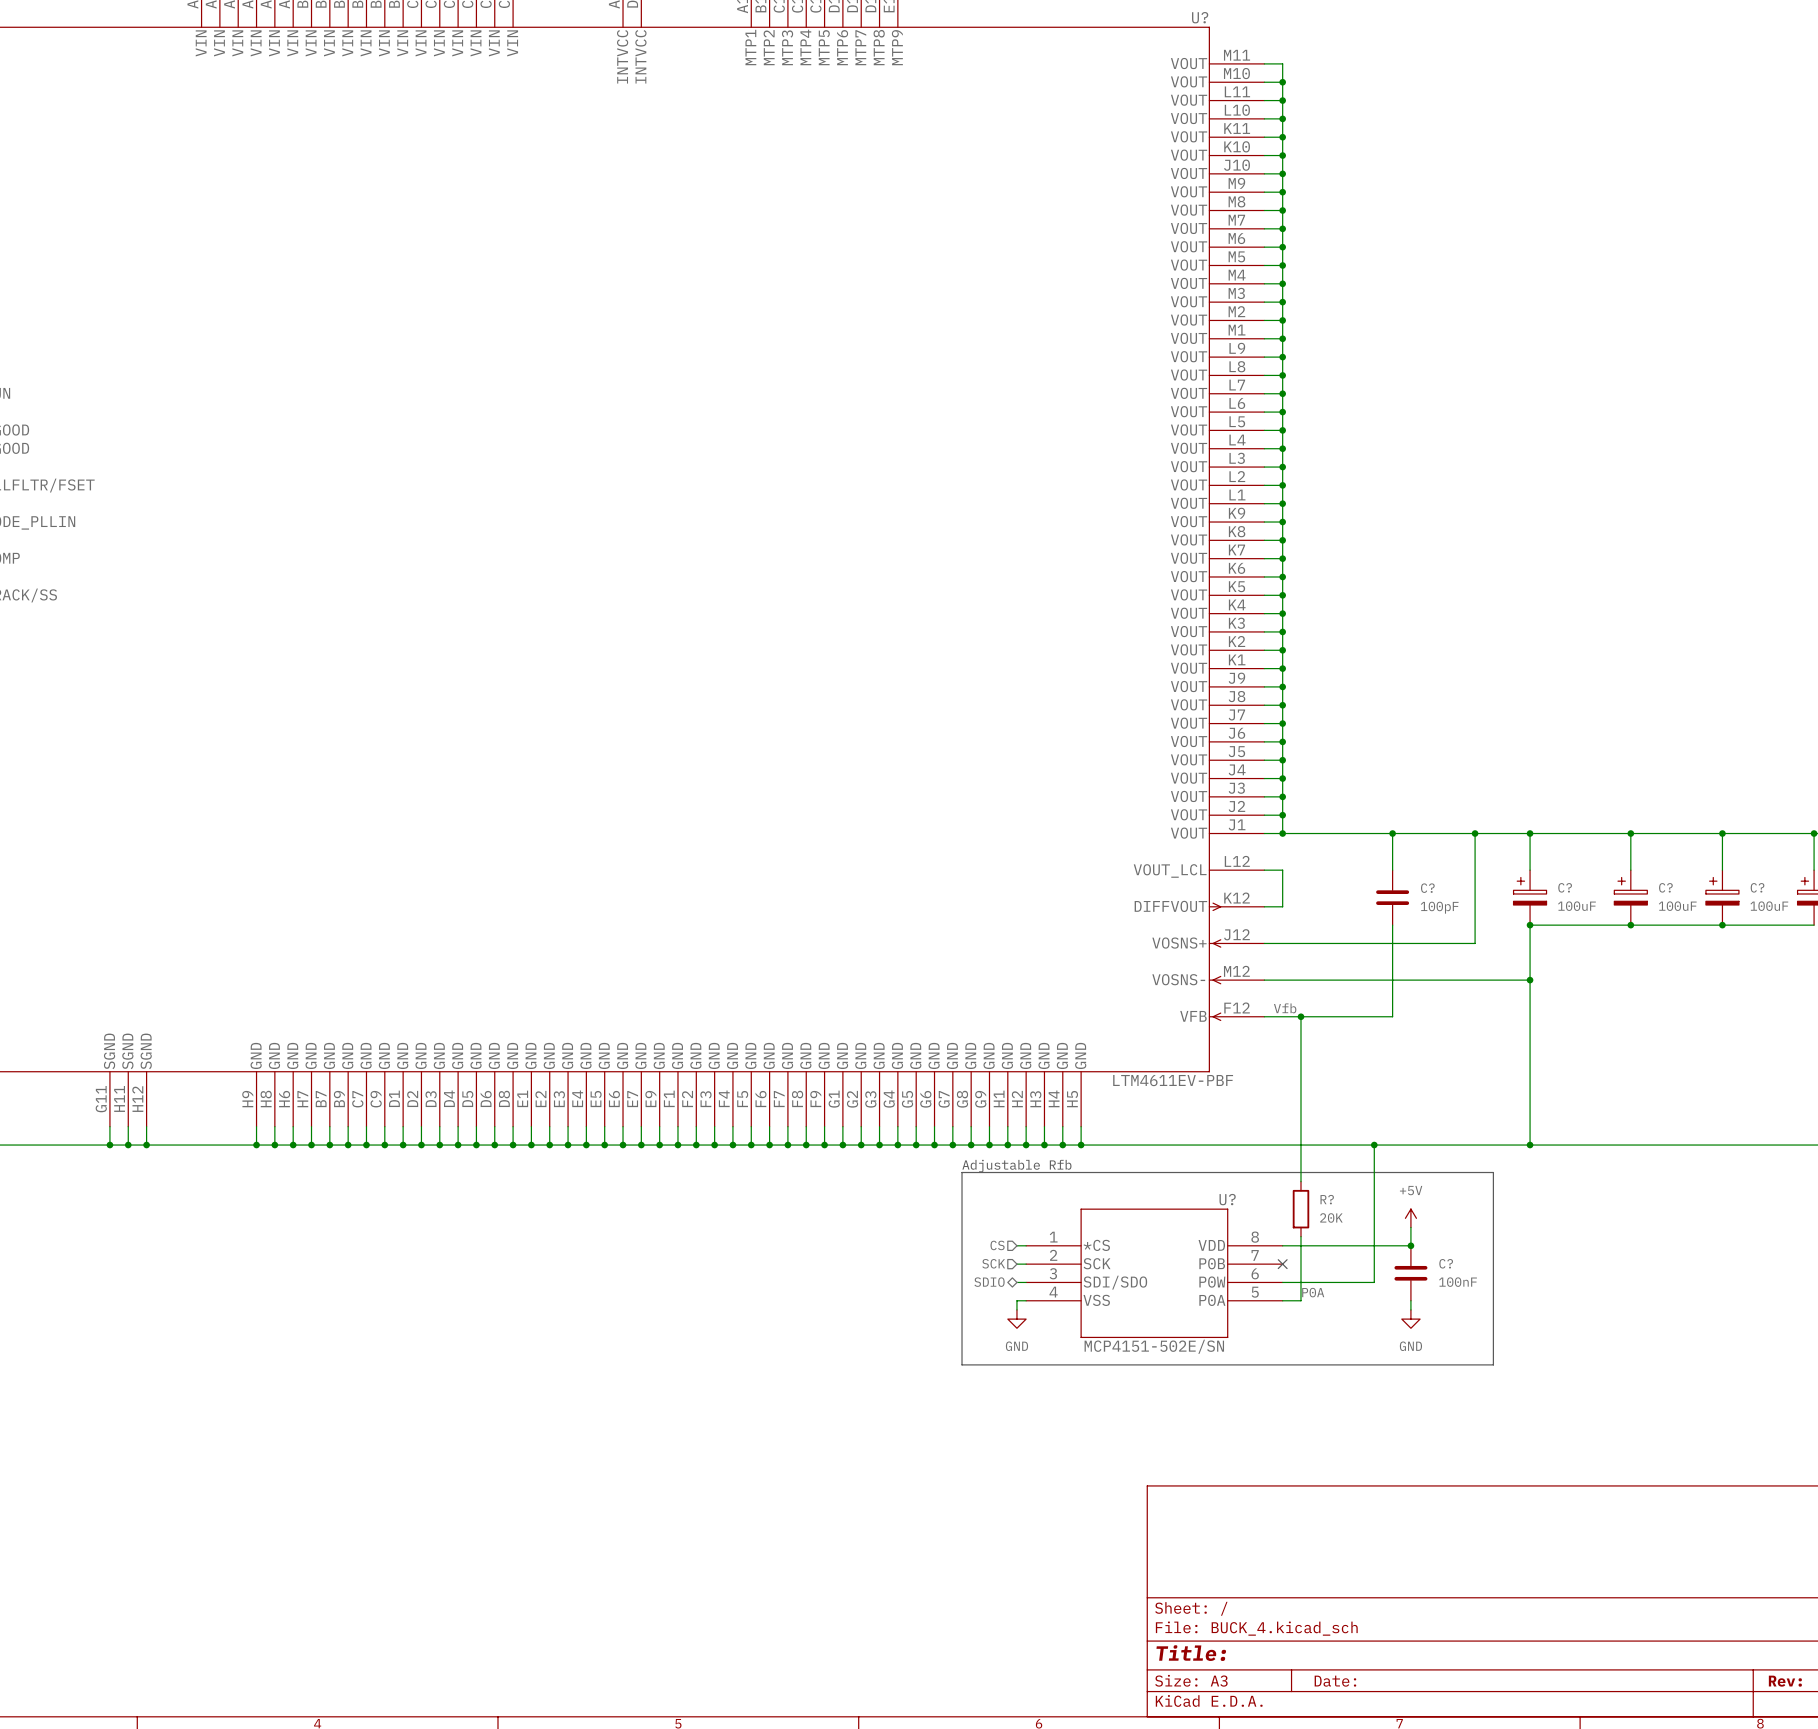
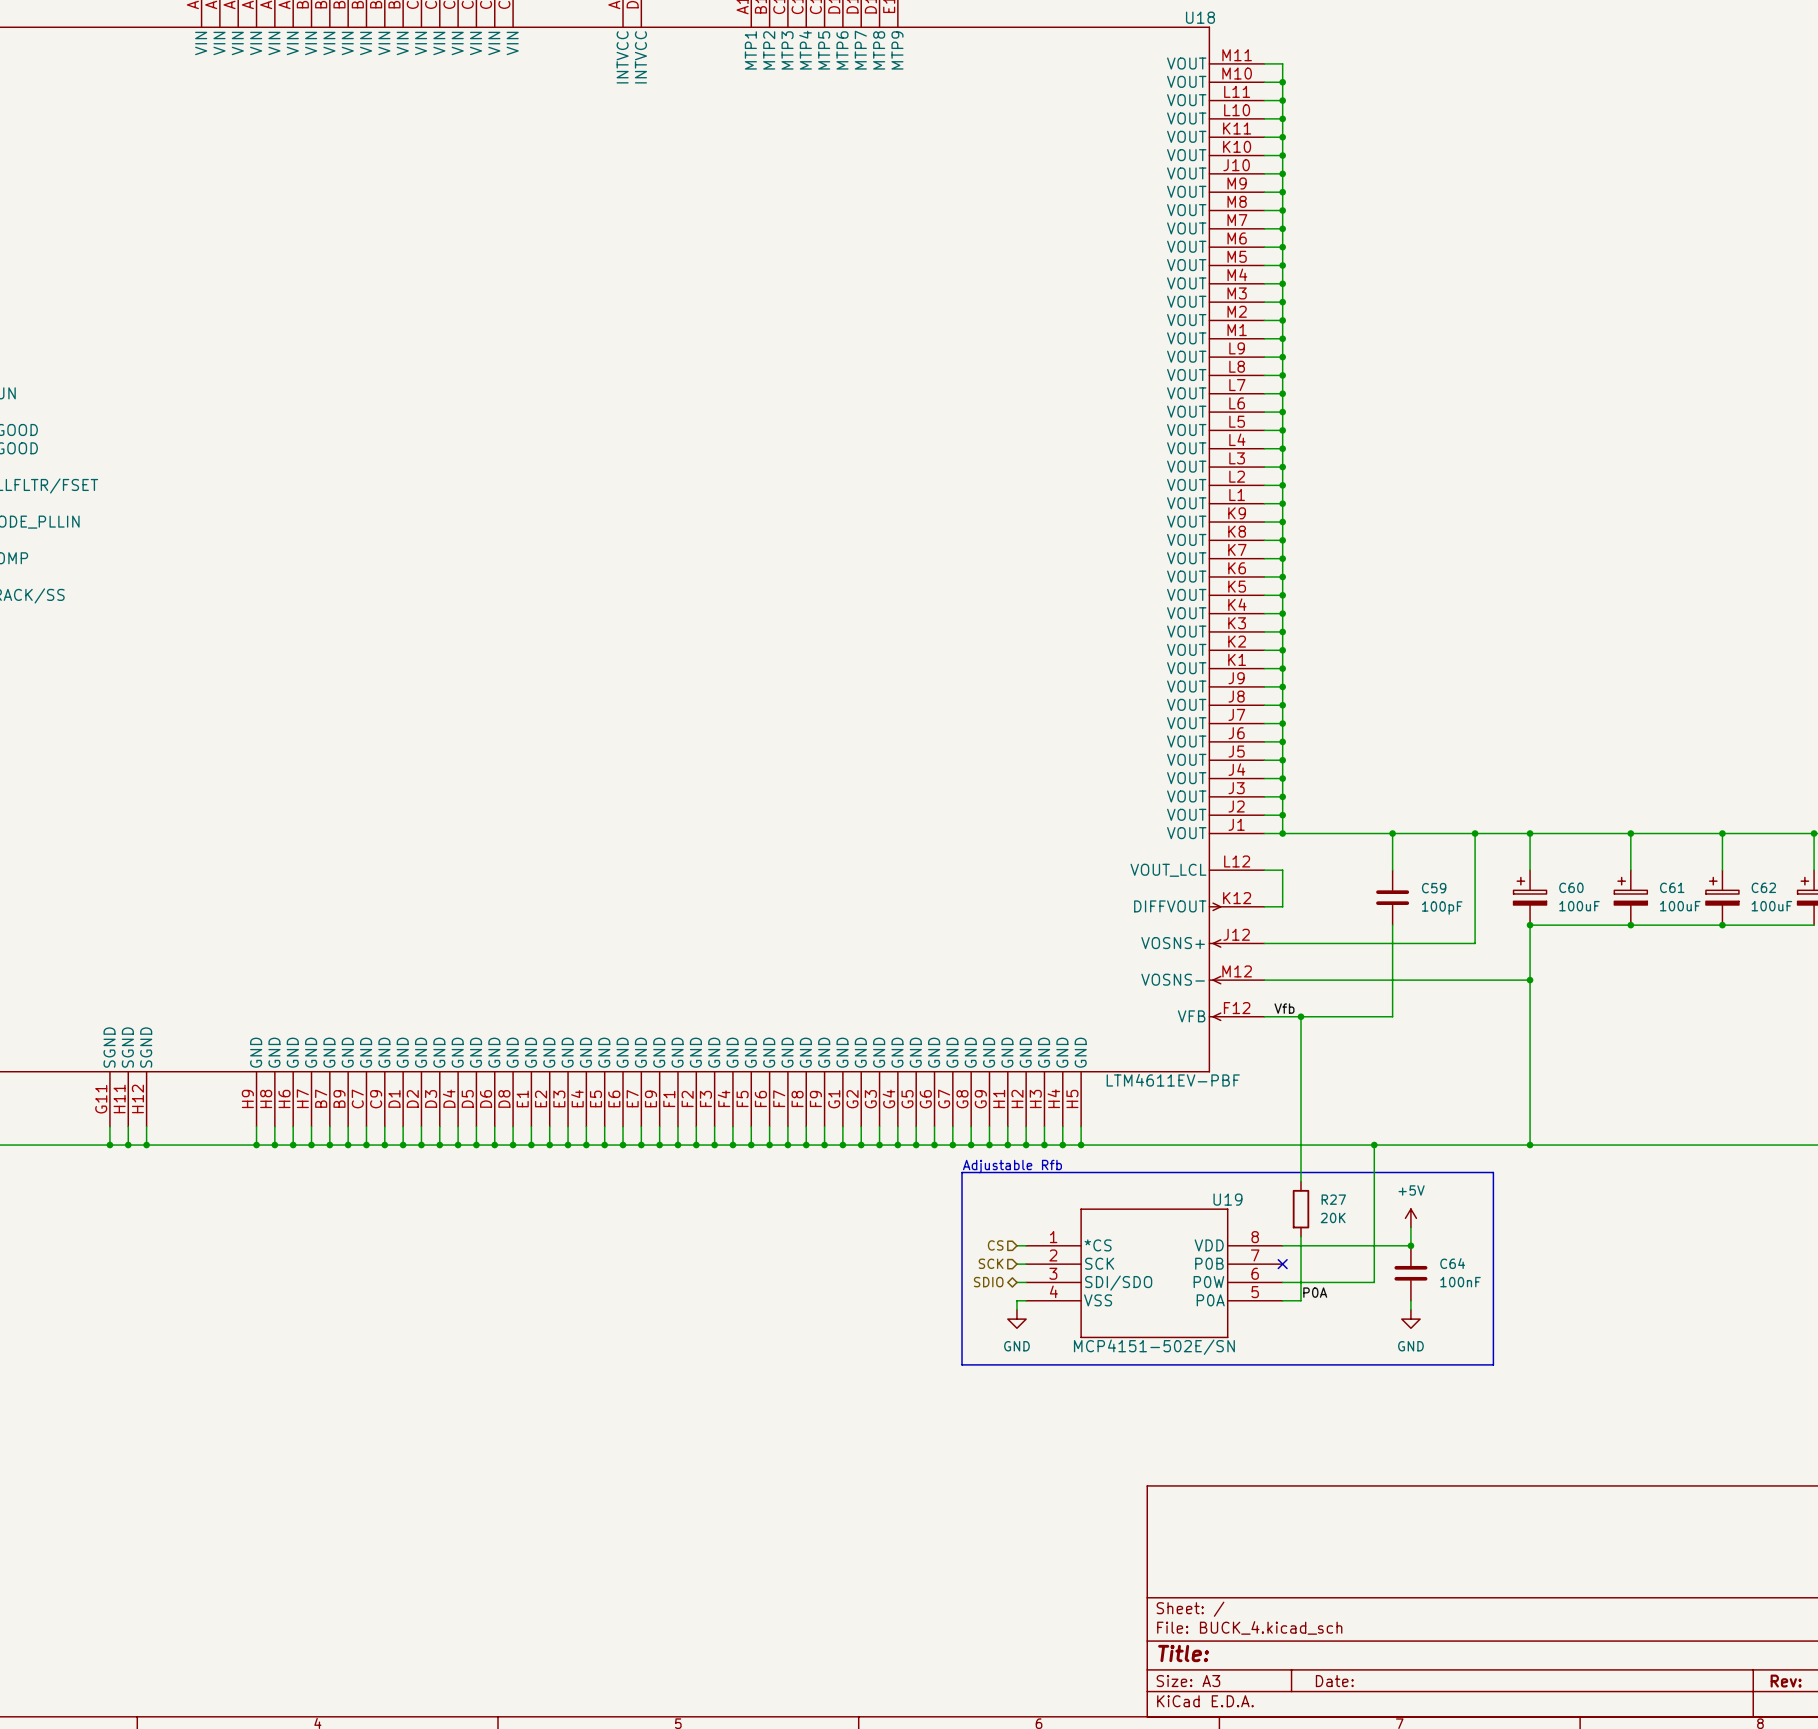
U? name: U? (1200, 17) -> U18 (1200, 17)
C? name: C? (1565, 887) -> C60 (1571, 887)
C? name: C? (1665, 887) -> C61 (1672, 887)
C? name: C? (1757, 887) -> C62 (1763, 887)
C? name: C? (1427, 888) -> C59 (1434, 888)
U? name: U? (1227, 1199) -> U19 (1227, 1199)
R? name: R? (1327, 1199) -> R27 (1333, 1199)
C? name: C? (1446, 1263) -> C64 (1452, 1263)

